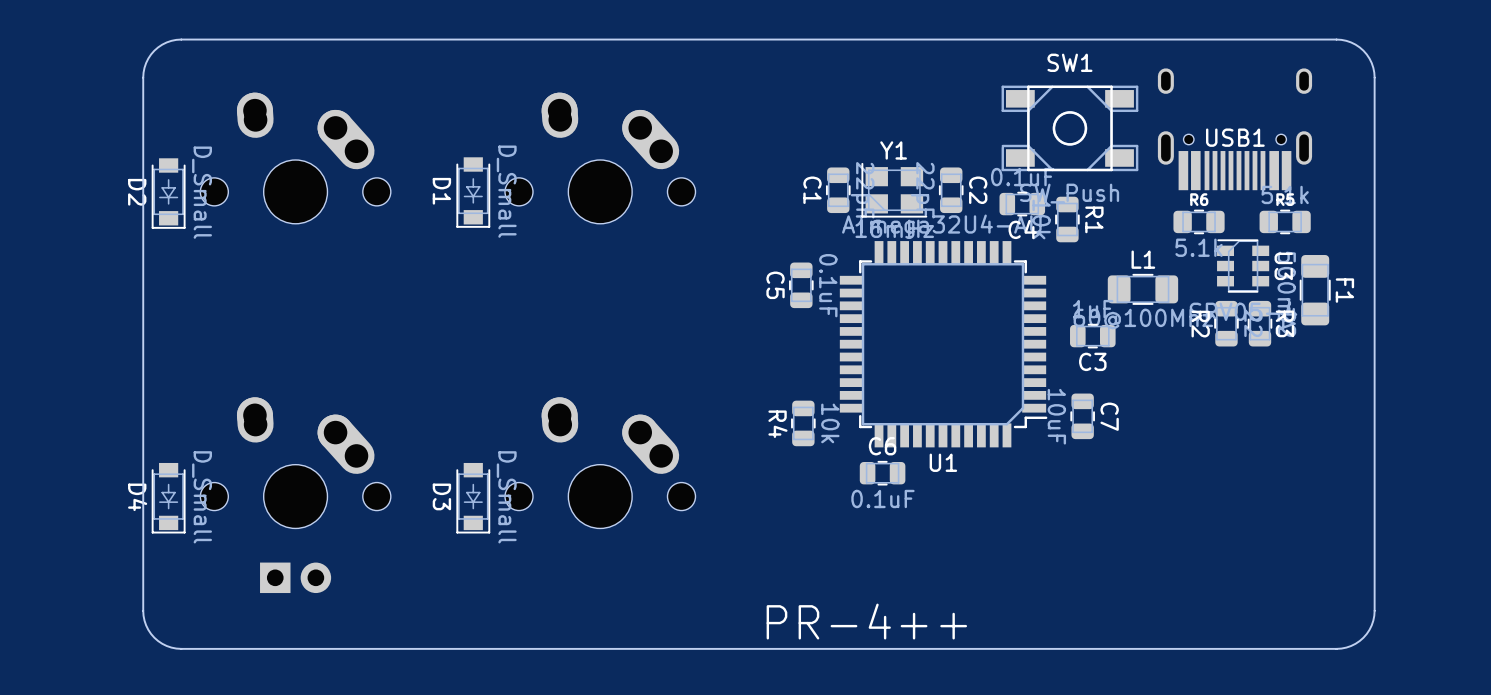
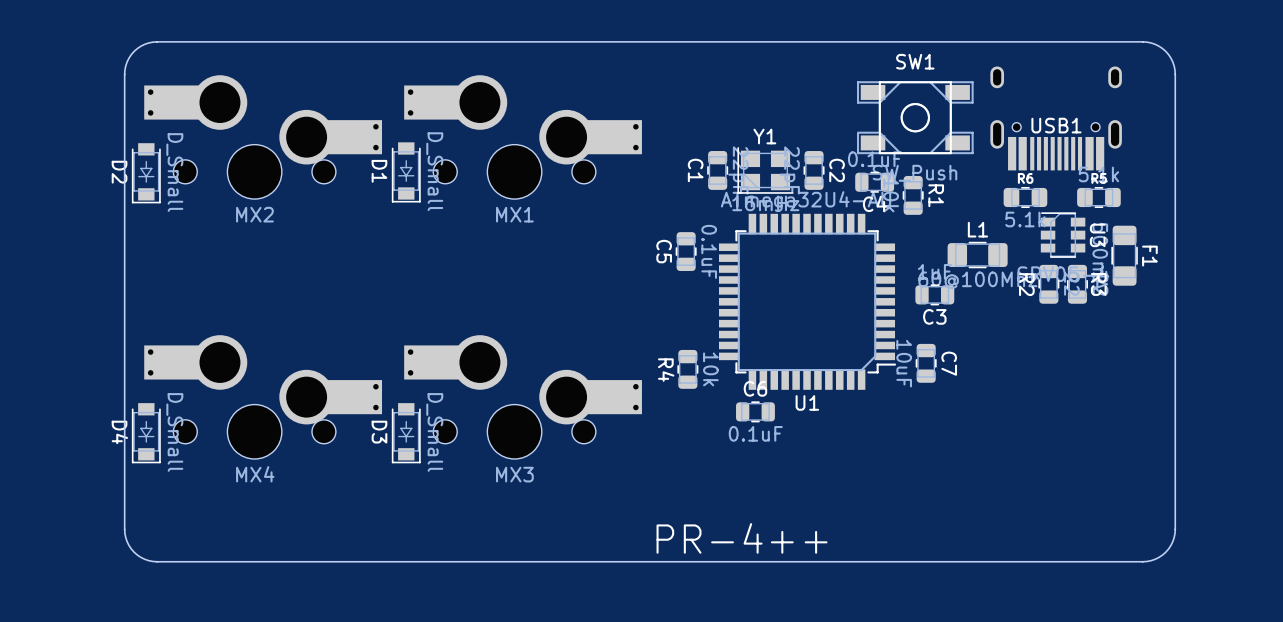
MX2: none -> (263, 137)
MX1: none -> (523, 137)
part: (295, 158) -> none
part: (600, 158) -> none
MX4: none -> (263, 397)
MX3: none -> (523, 397)
part: (600, 462) -> none
part: (295, 495) -> none

